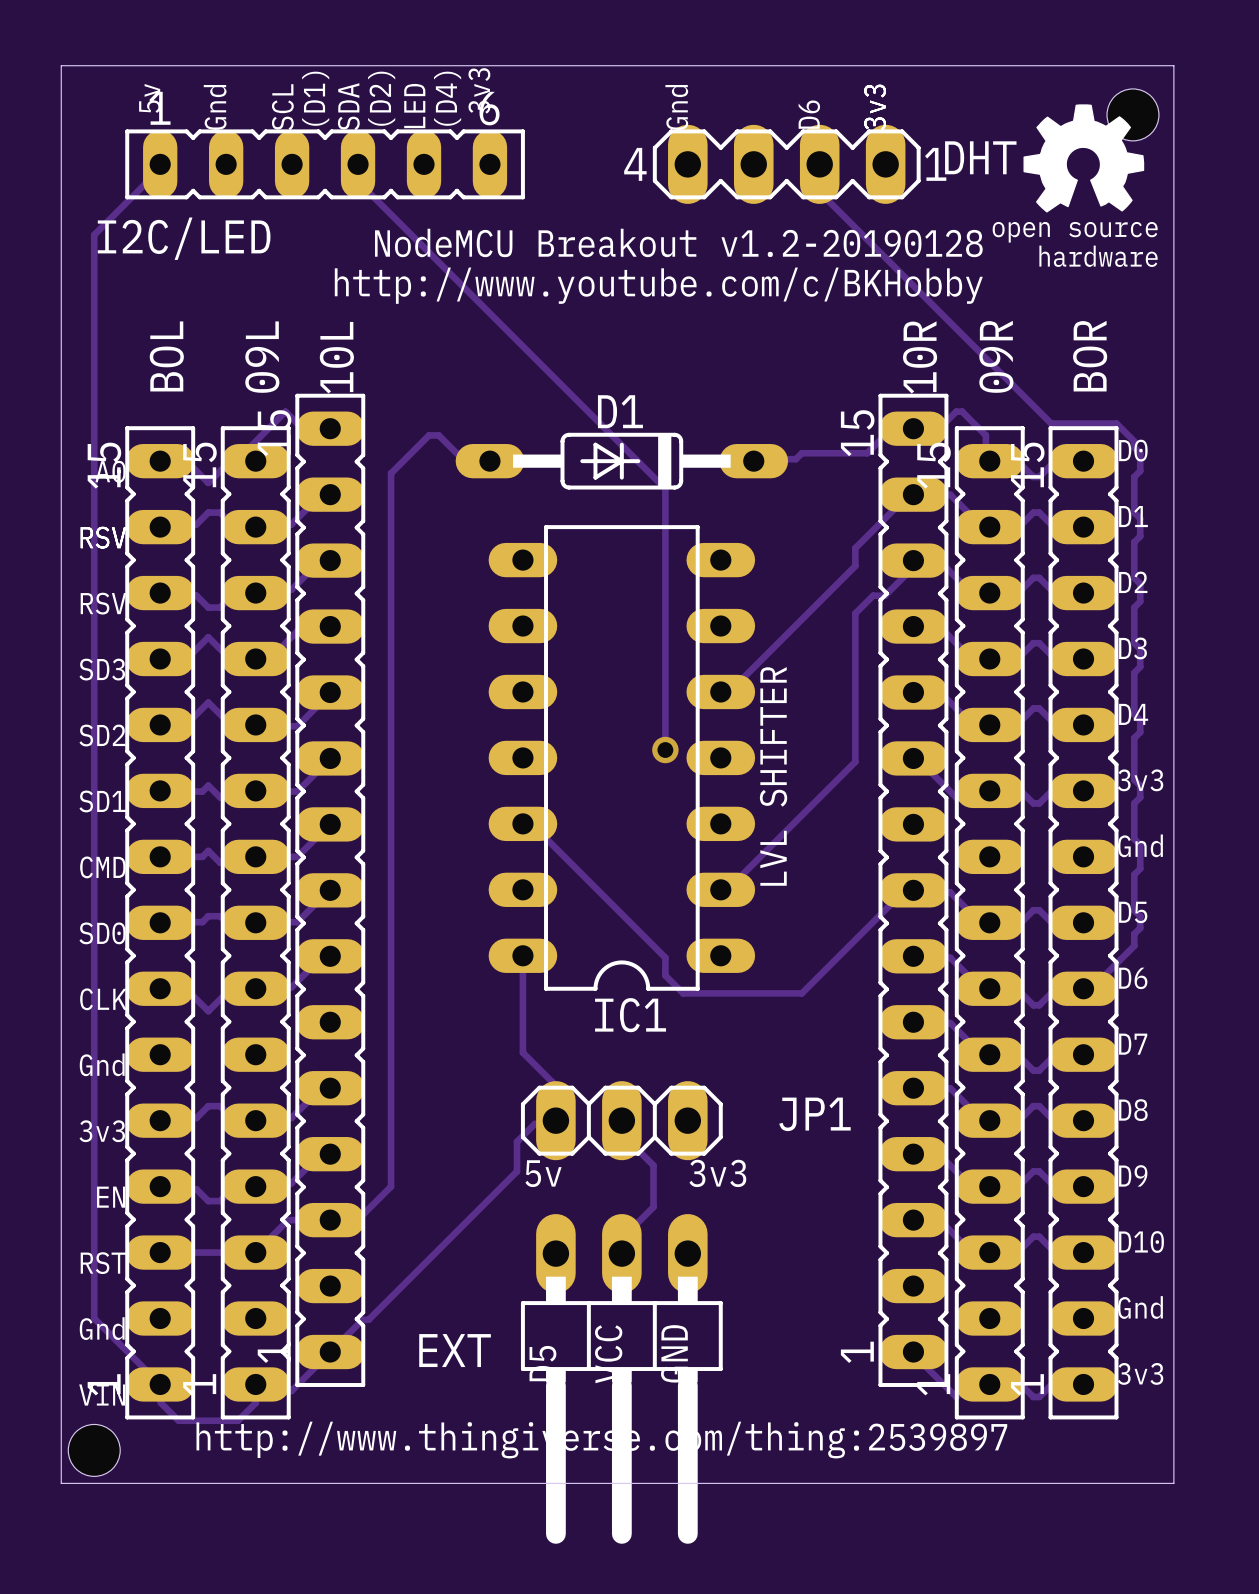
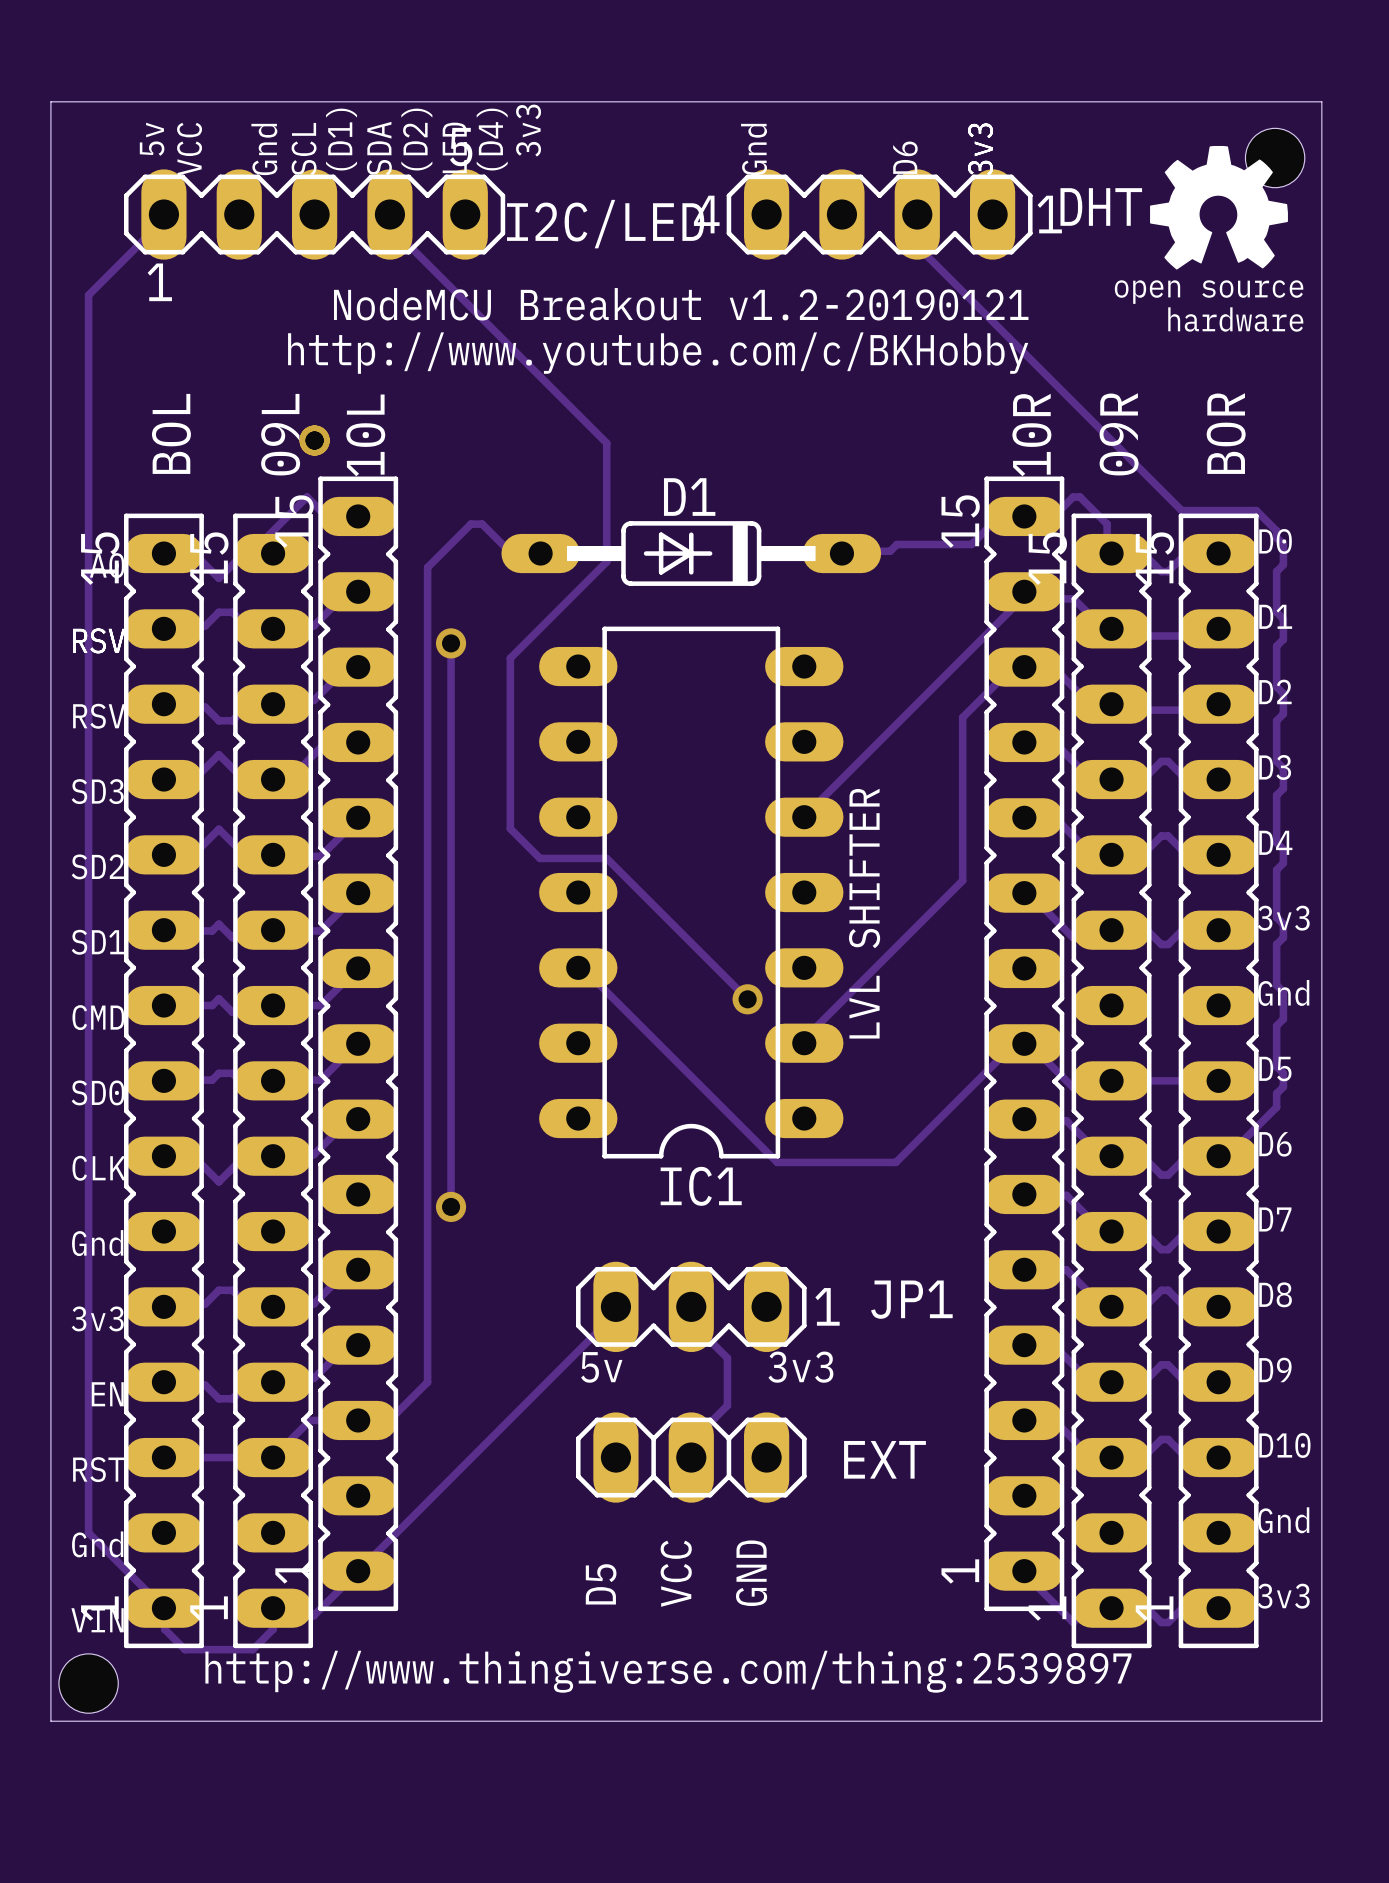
text: none -> VCC (189, 149)
text position: Gnd (215, 107) -> Gnd (264, 149)
I2C/LED footprint: [125, 129, 525, 200] -> [124, 169, 506, 260]
track: (358, 164) (362, 168) (362, 186) (665, 488) (665, 750) -> (389, 214) (384, 220) (606, 443) (606, 561) (510, 658) (510, 828) (540, 858) (606, 858) (747, 999)
I2C/LED name position: I2C/LED (184, 238) -> I2C/LED (605, 224)
text: NodeMCU Breakout v1.2-20190128 (678, 242) -> NodeMCU Breakout v1.2-20190121 (681, 304)
text position: http://www.youtube.com/c/BKHobby (658, 285) -> http://www.youtube.com/c/BKHobby (658, 353)
via: none -> (314, 440)
track: (1083, 527) (1080, 524) (1051, 524) (1039, 512) (1033, 512) (1021, 524) (991, 524) (985, 530) (950, 494) (908, 494) (855, 548) (855, 566) (742, 678) (736, 678) (724, 690) (720, 691) -> (1218, 628) (1214, 635) (1118, 635) (1111, 628) (1110, 635) (1073, 598) (1029, 598) (1024, 591) (1021, 598) (804, 817)
track: none -> (451, 643) (451, 1206)
via: none -> (451, 643)
track: (1083, 593) (1080, 589) (1051, 589) (1039, 577) (1033, 577) (1021, 589) (991, 589) (989, 593) (985, 589) (968, 589) (944, 566) (914, 566) (885, 595) (873, 595) (855, 613) (855, 761) (730, 886) (724, 886) (720, 889) -> (1218, 704) (1214, 710) (1118, 710) (1110, 702) (1088, 702) (1059, 673) (1029, 673) (1024, 667) (1021, 673) (1007, 673) (962, 717) (962, 880) (806, 1036) (804, 1043)
via position: (665, 750) -> (747, 999)
track: (522, 823) (522, 827) (534, 827) (665, 957) (665, 975) (683, 993) (801, 993) (908, 886) (914, 892) (950, 892) (985, 928) (991, 922) (1021, 922) (1033, 910) (1039, 910) (1051, 922) (1083, 922) -> (578, 967) (584, 969) (777, 1162) (895, 1162) (1014, 1043) (1029, 1043) (1073, 1088) (1103, 1088) (1110, 1080) (1218, 1080)
track: (522, 955) (522, 1052) (552, 1082) (552, 1118) (555, 1120) (552, 1123) (534, 1123) (516, 1141) (516, 1171) (368, 1319) (362, 1319) (332, 1349) -> (615, 1306) (615, 1313) (361, 1568)
via: none -> (451, 1206)
JP1 footprint: [520, 1081, 723, 1161] -> [576, 1261, 807, 1353]
EXT: none -> (691, 1457)
EXT: (621, 1378) -> none

